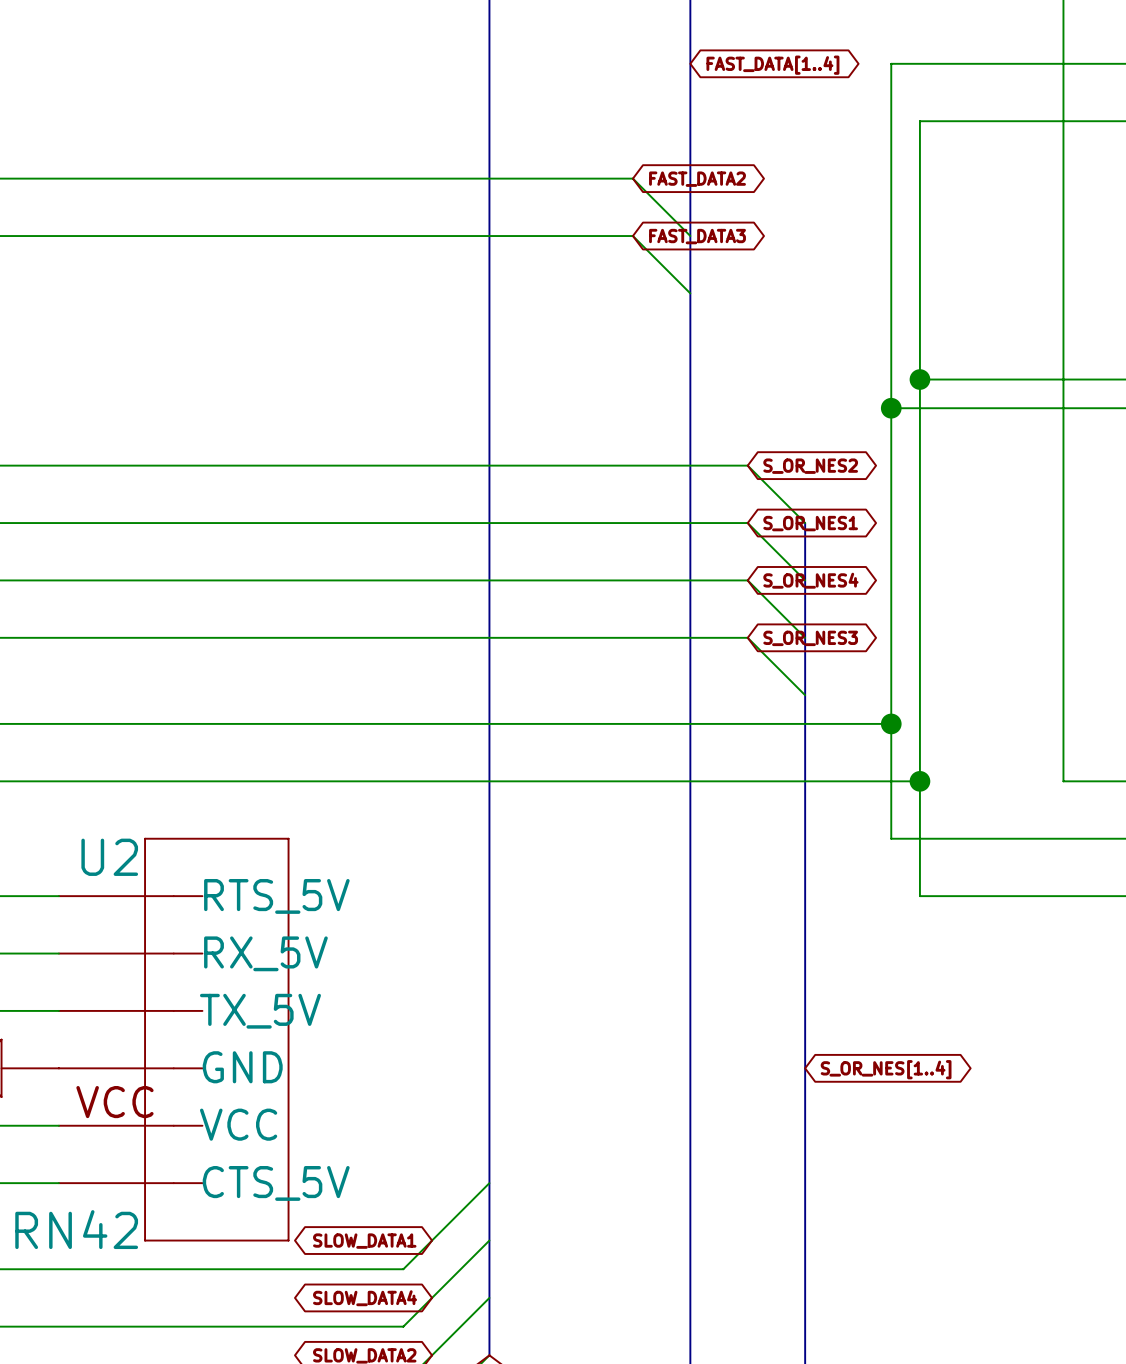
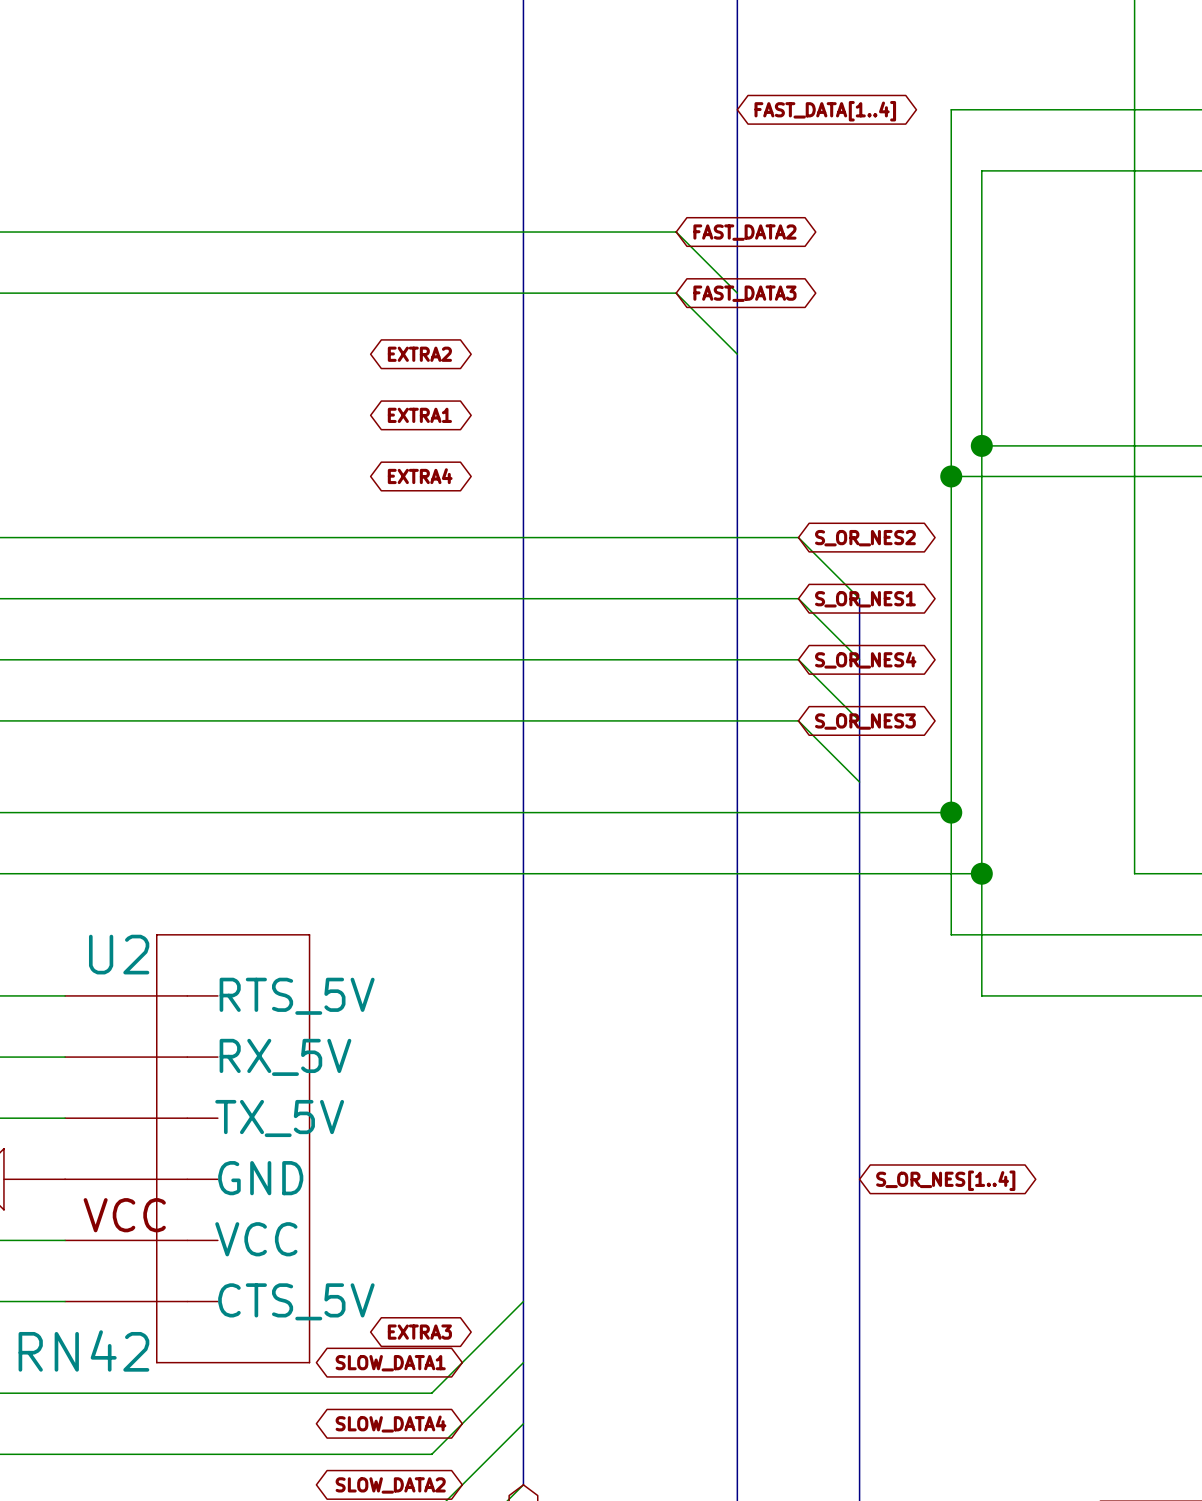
global label: none -> EXTRA2 (419, 354)
global label: none -> EXTRA1 (419, 415)
global label: none -> EXTRA4 (420, 476)
global label: none -> EXTRA3 (419, 1332)

